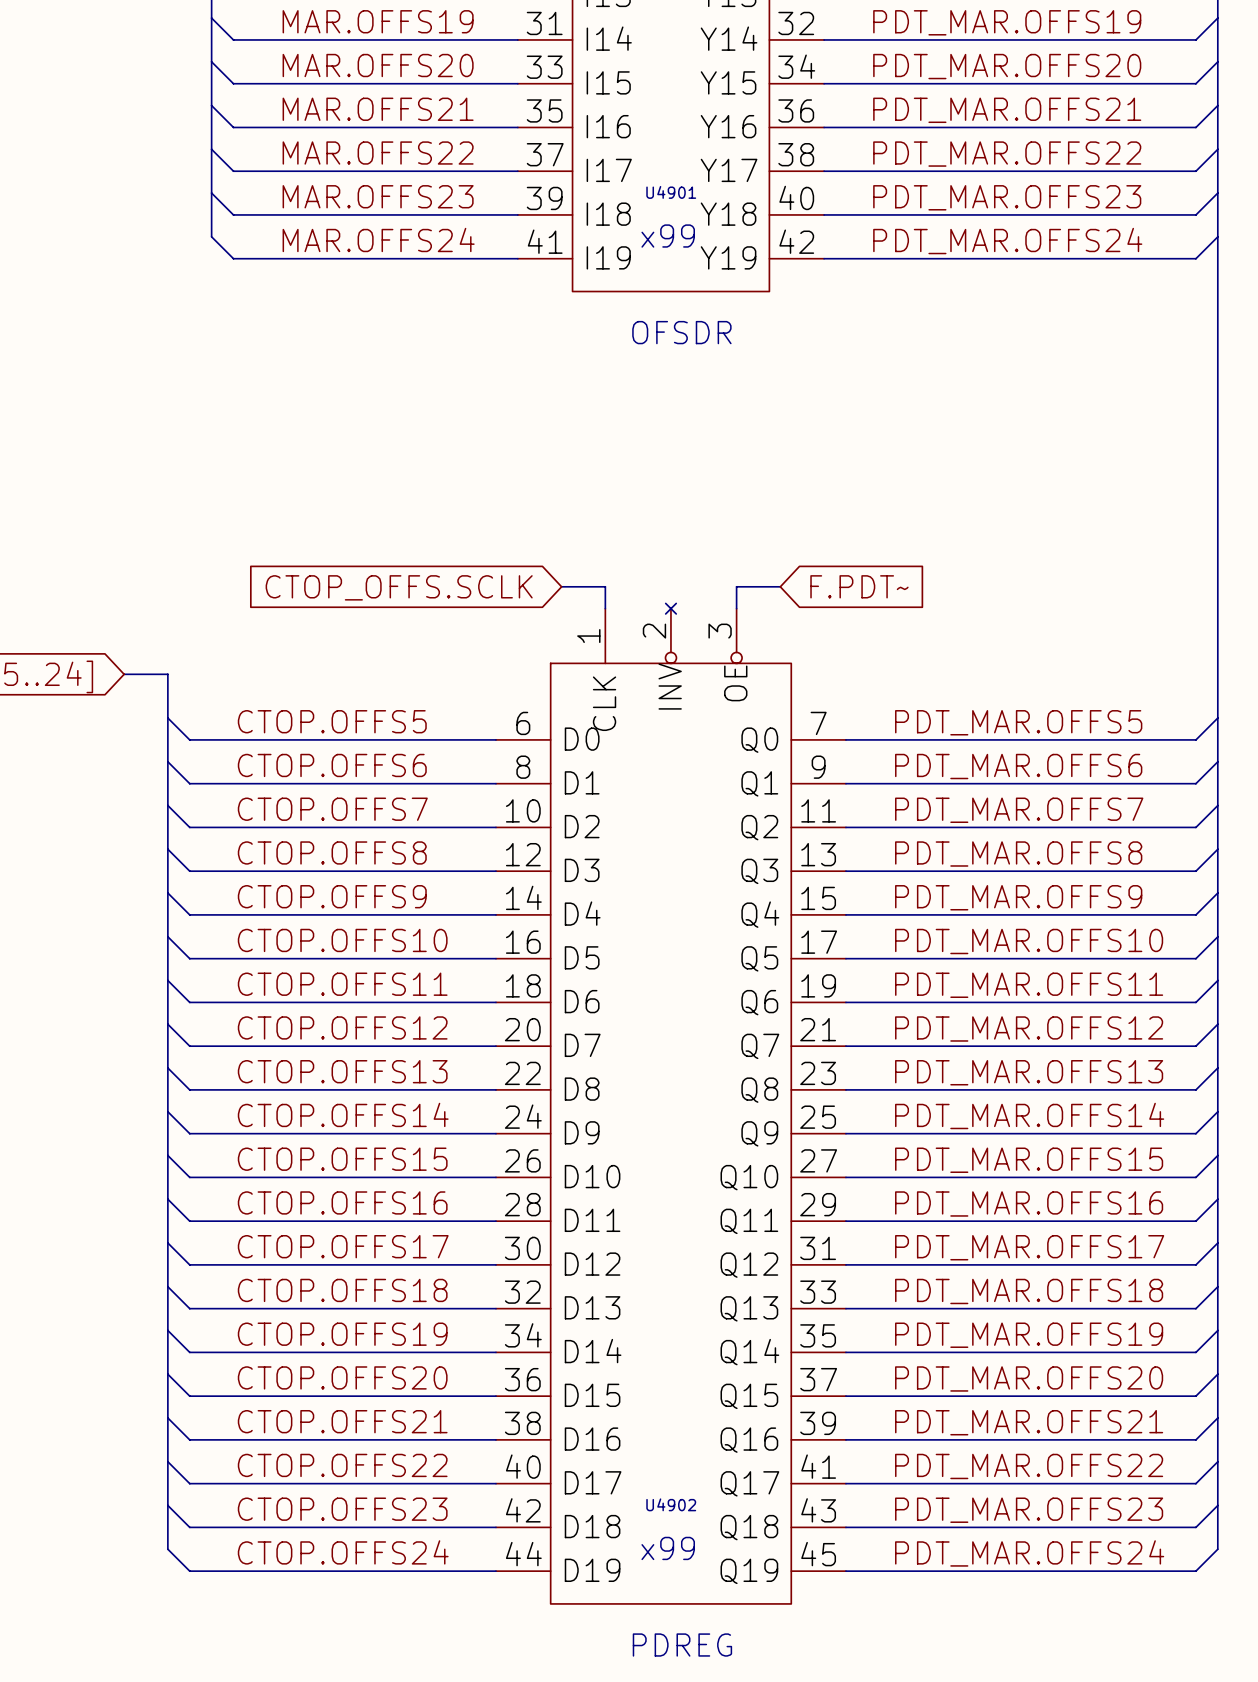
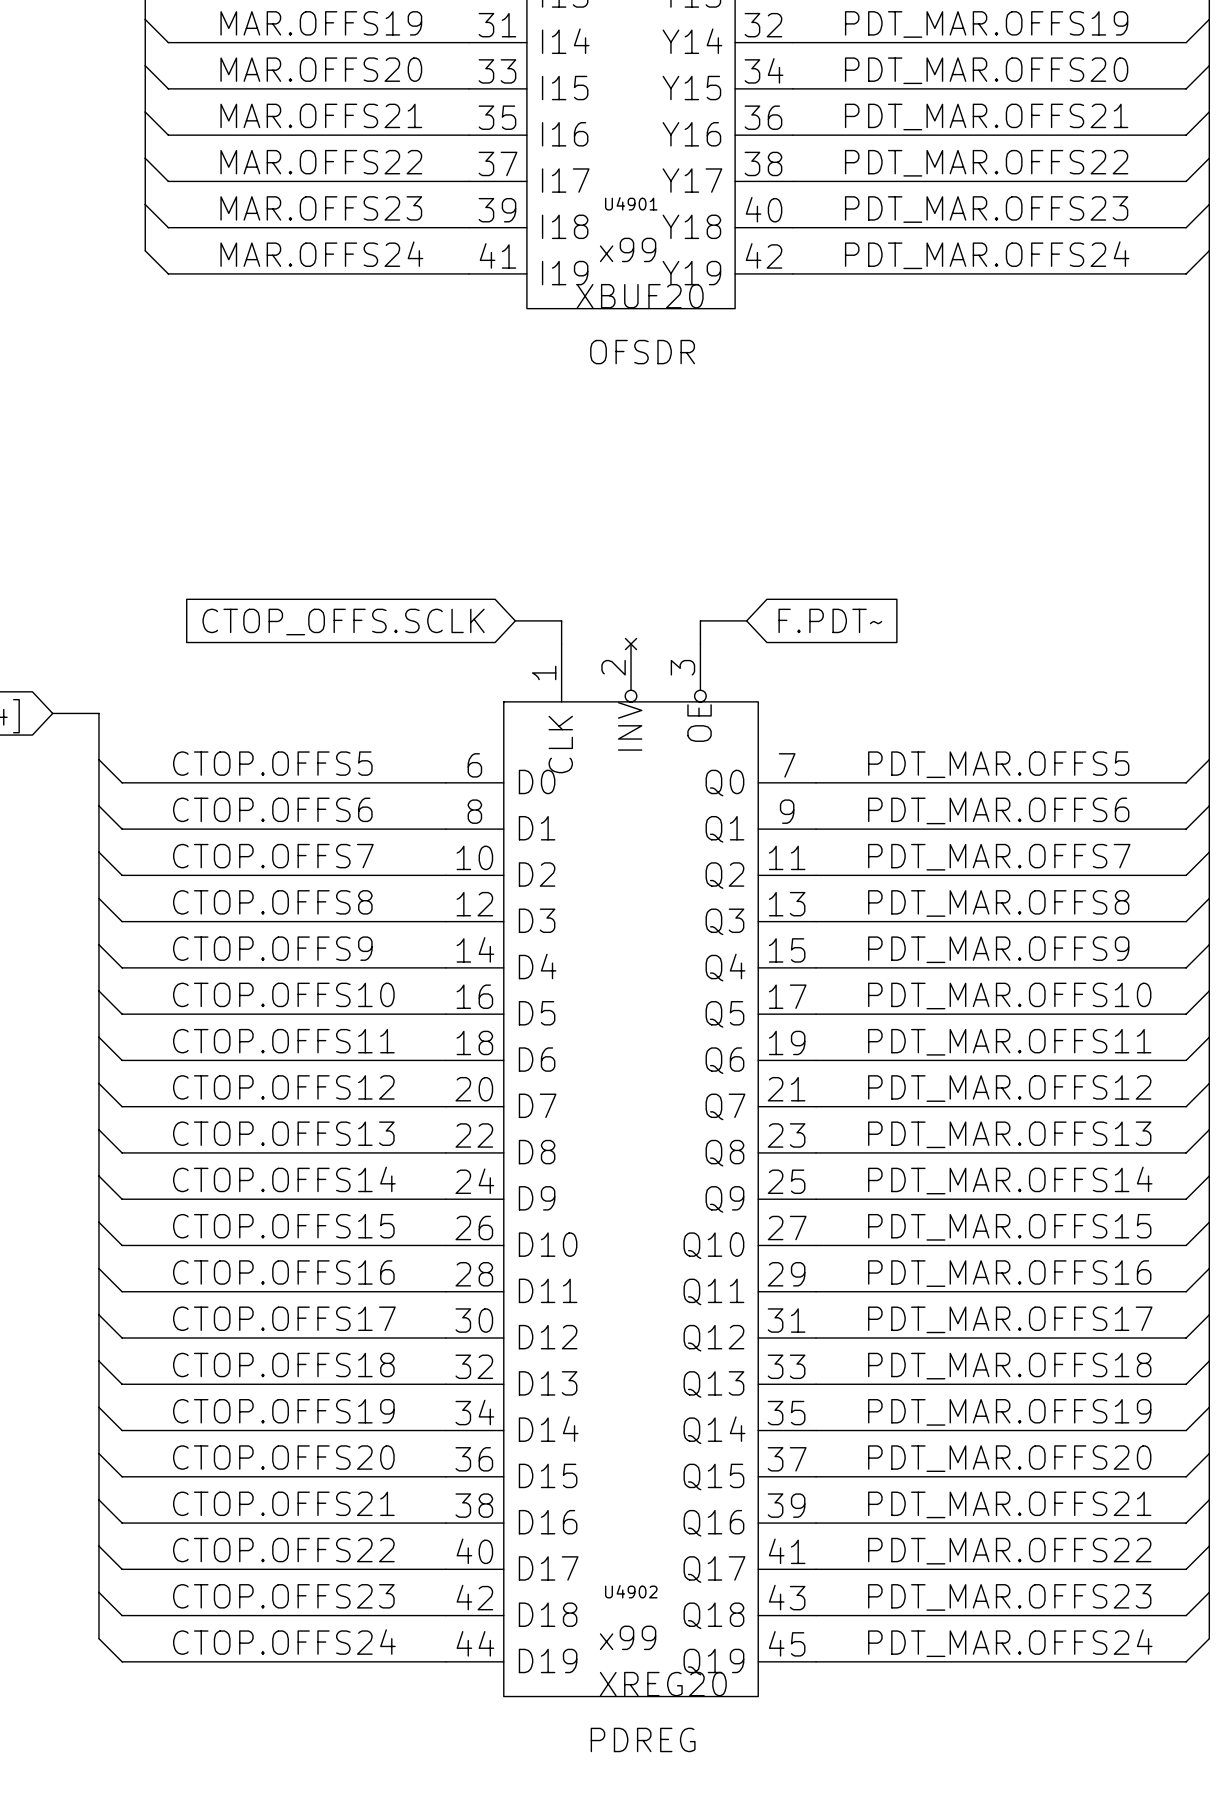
U4901 value: none -> XBUF20 (640, 296)
U4902 value: none -> XREG20 (663, 1684)

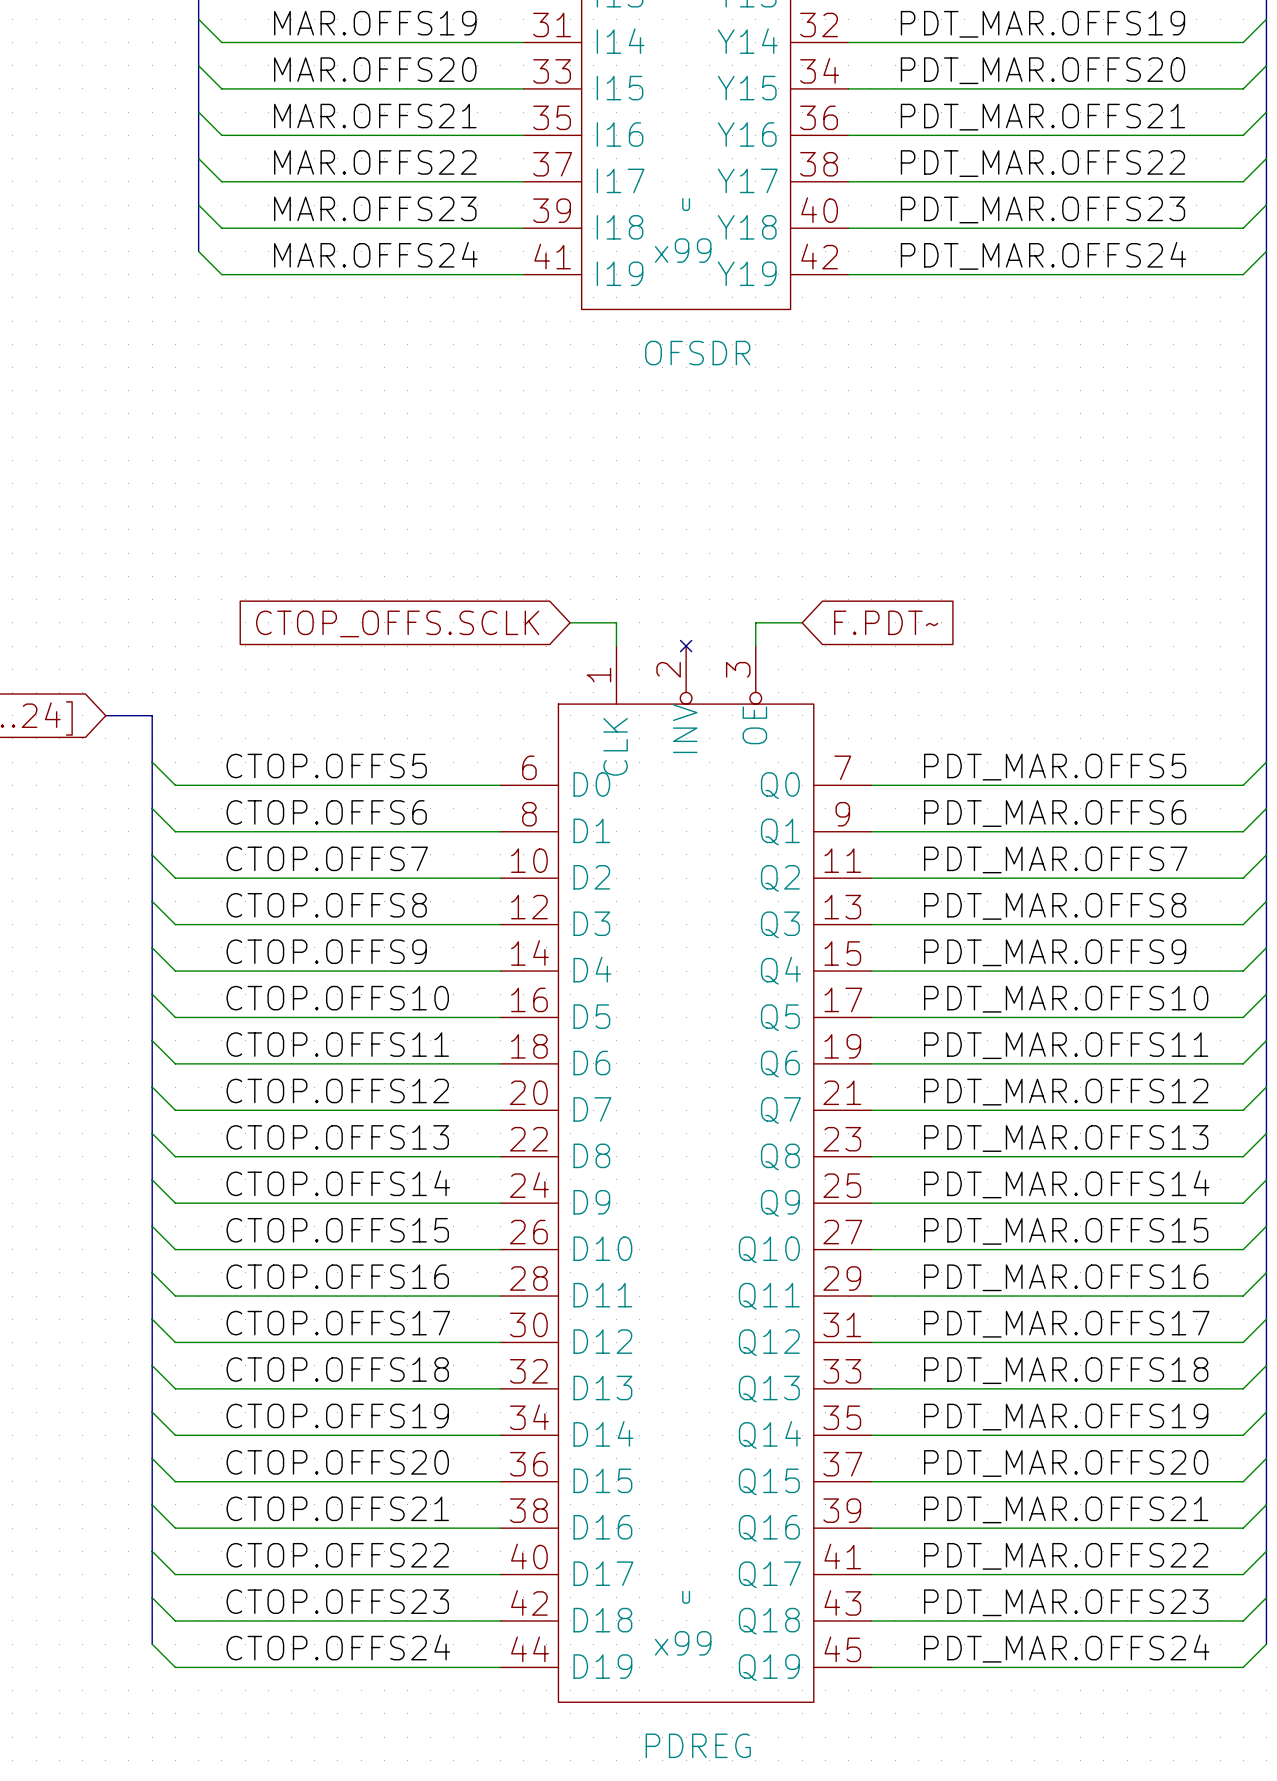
U4901 name: U4901 (631, 203) -> U (686, 204)
U4901 value: XBUF20 (640, 296) -> none
U4902 name: U4902 (631, 1591) -> U (686, 1597)
U4902 value: XREG20 (663, 1684) -> none

